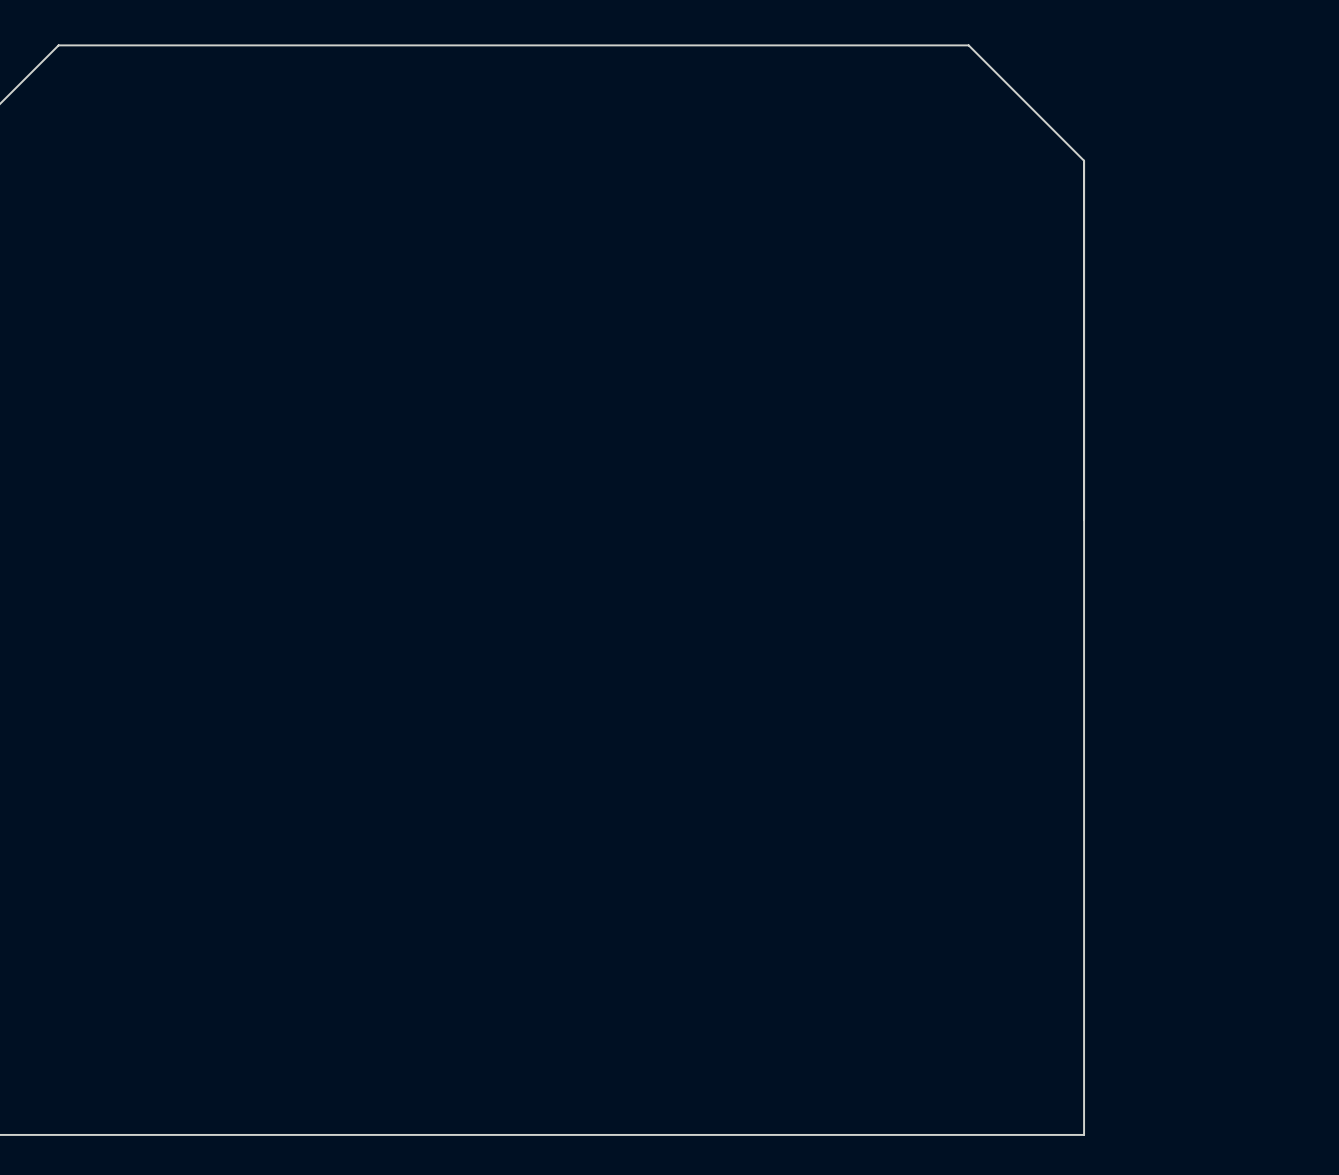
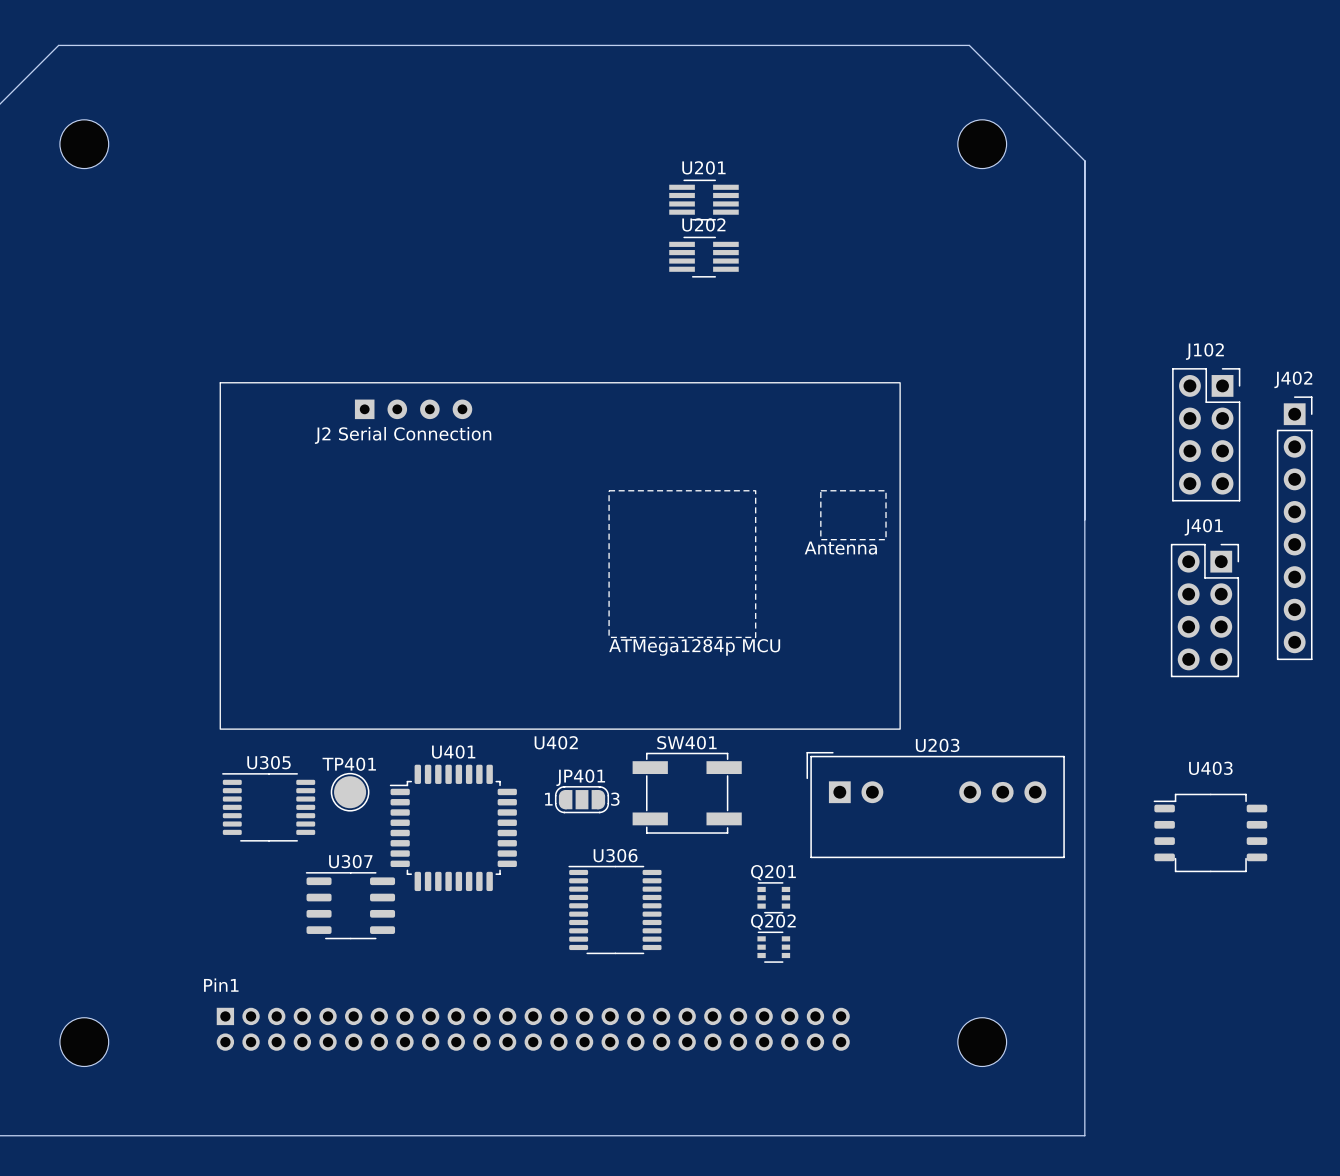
part: none -> (84, 144)
part: none -> (982, 144)
U201: none -> (703, 200)
U202: none -> (703, 257)
J102: none -> (1206, 434)
J402: none -> (1294, 528)
U402: none -> (560, 555)
J401: none -> (1204, 610)
TP401: none -> (350, 792)
SW401: none -> (687, 793)
JP401: none -> (582, 799)
U203: none -> (935, 805)
U305: none -> (268, 807)
U401: none -> (453, 827)
U403: none -> (1210, 832)
Q201: none -> (773, 897)
U307: none -> (350, 905)
U306: none -> (614, 909)
Q202: none -> (773, 947)
text: none -> Pin1 (221, 985)
part: none -> (533, 1029)
part: none -> (84, 1042)
part: none -> (982, 1042)

